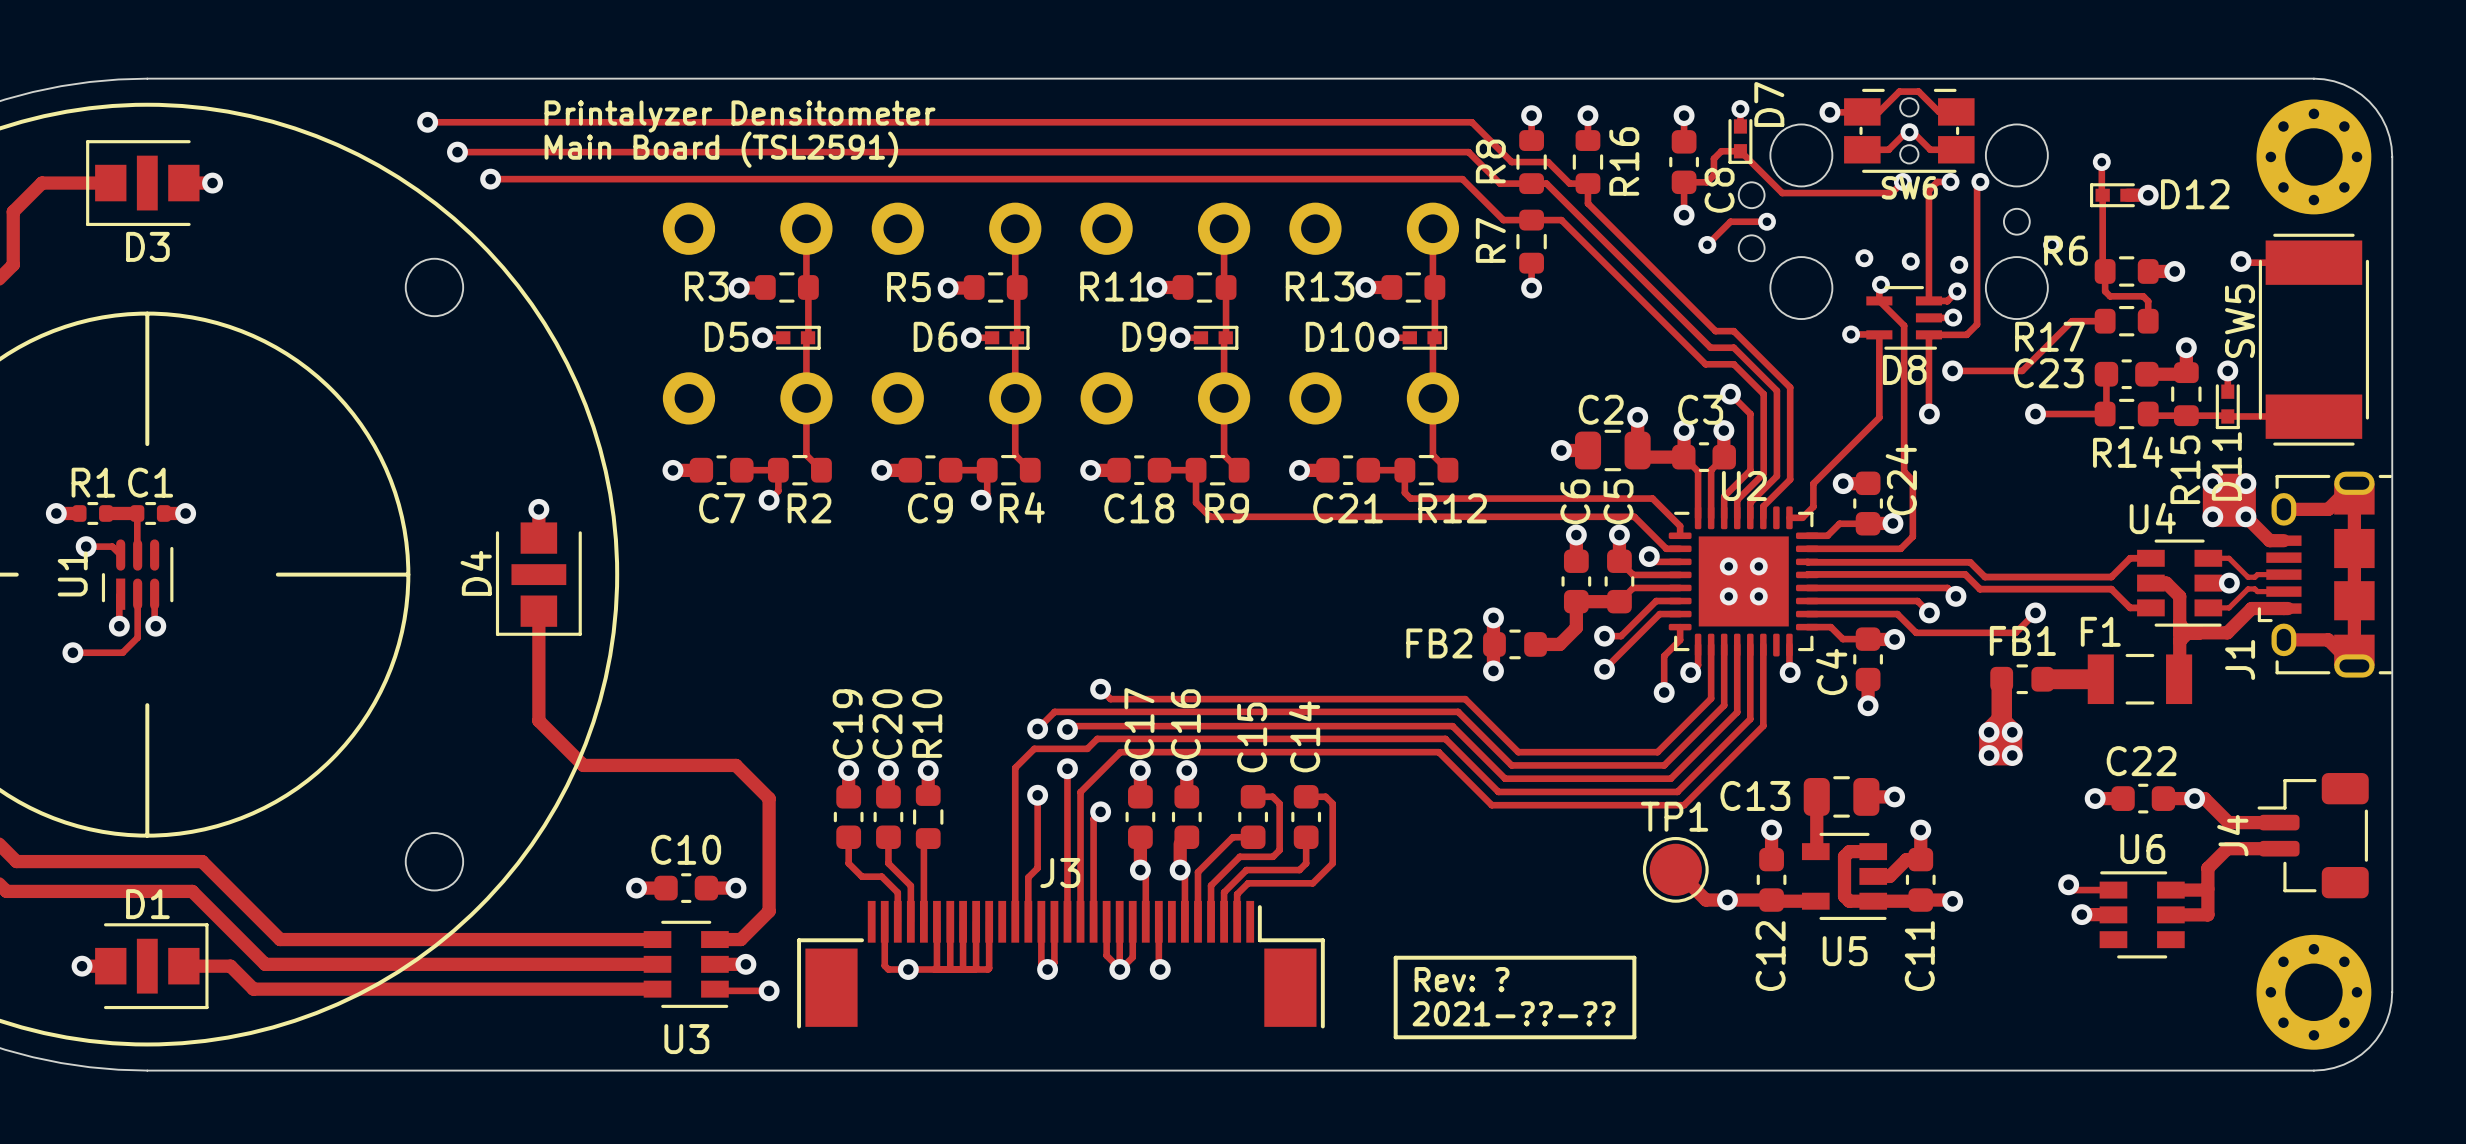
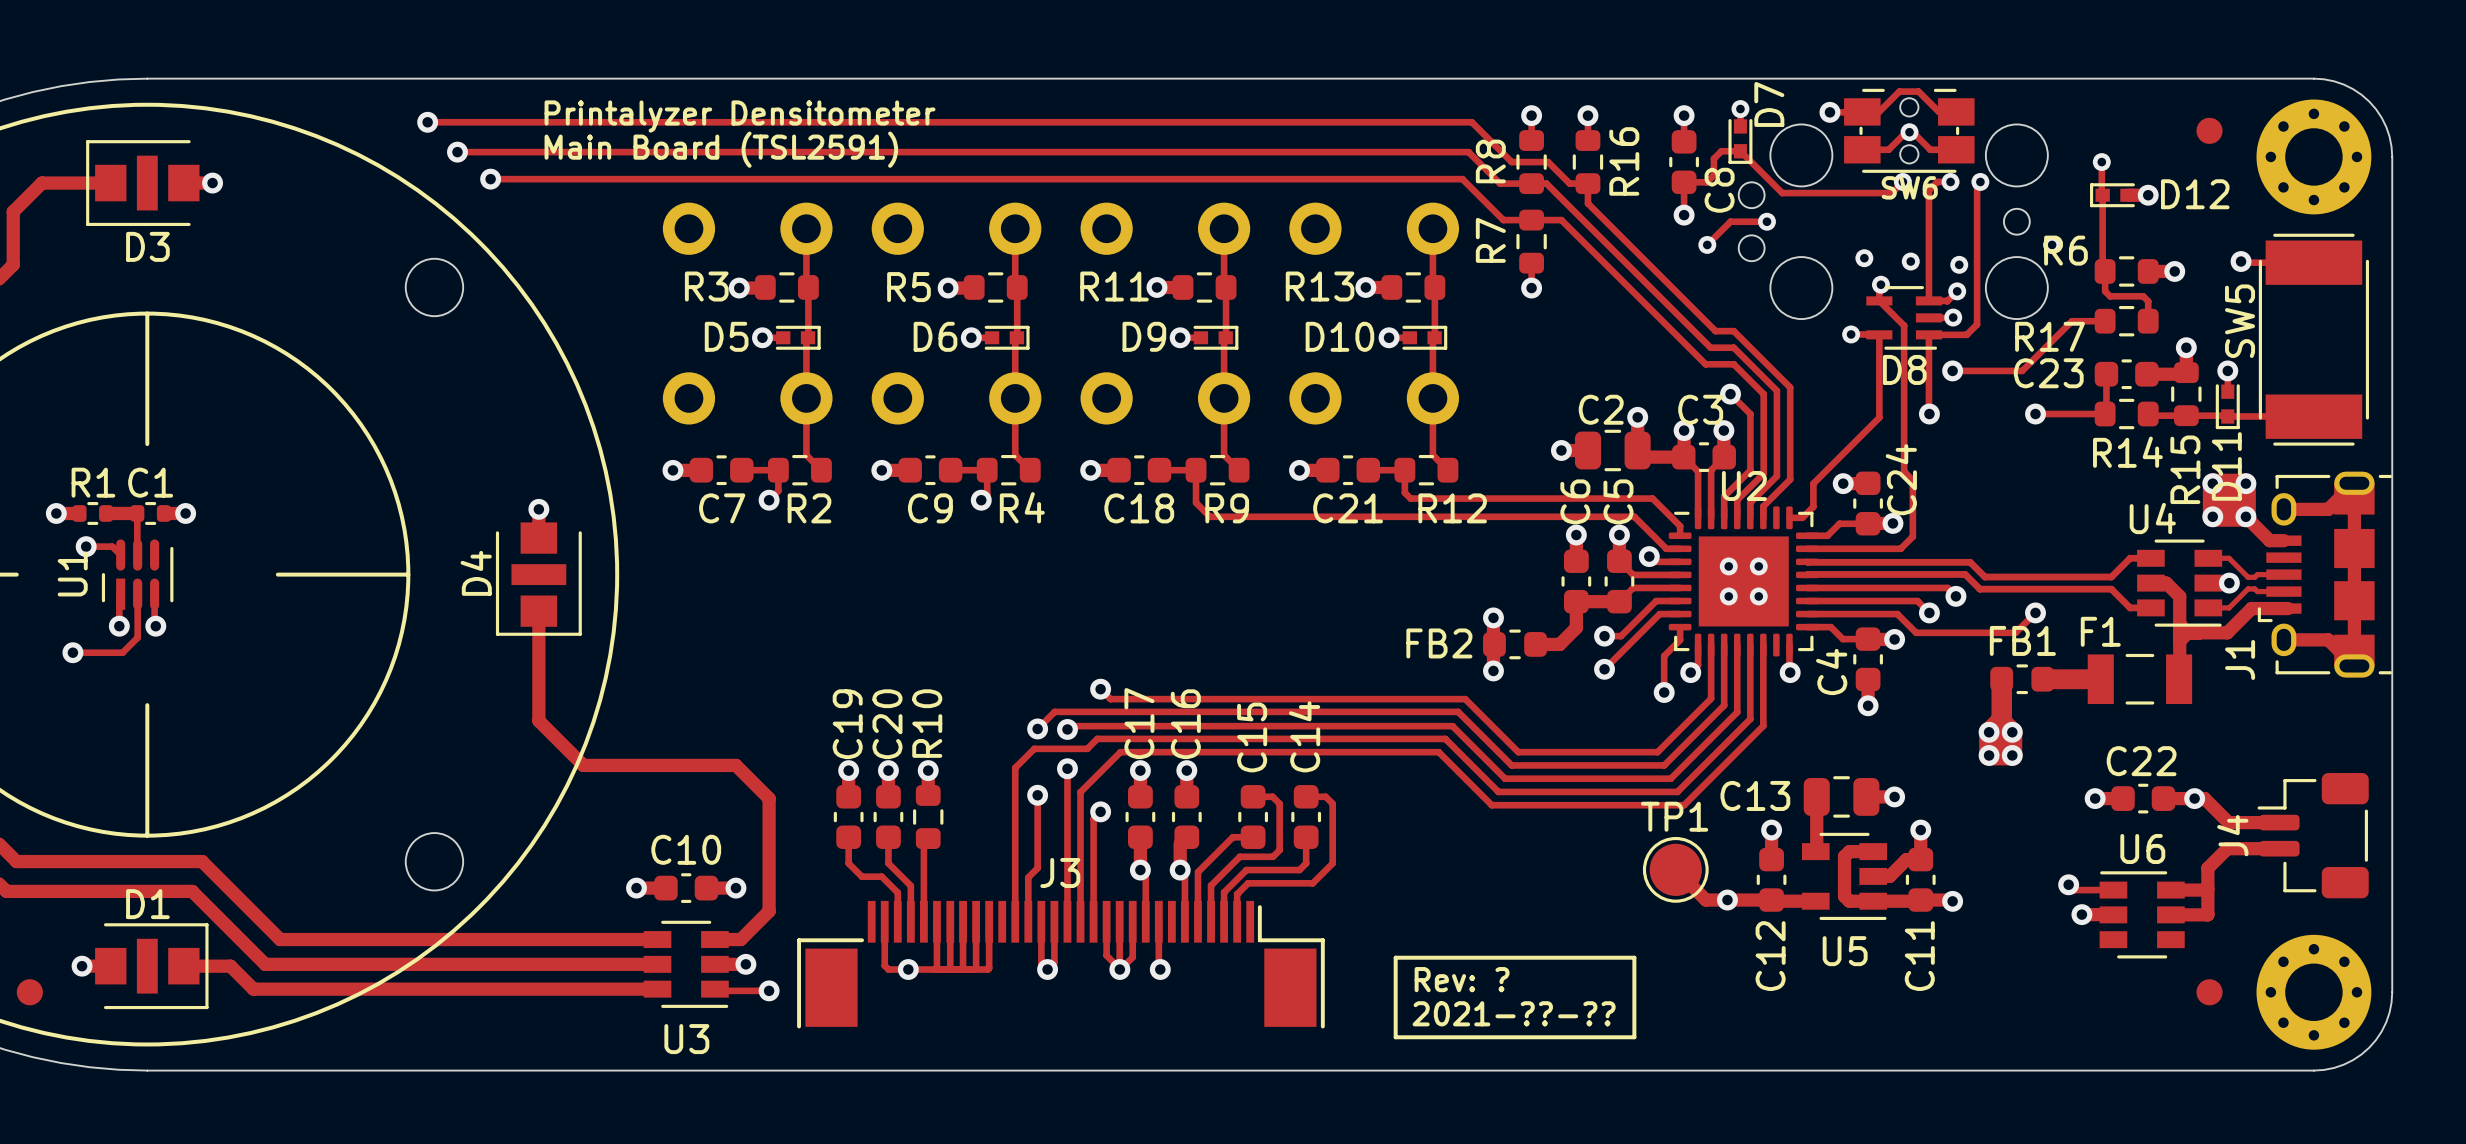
part: none -> (2209, 130)
part: none -> (29, 992)
part: none -> (2209, 992)

